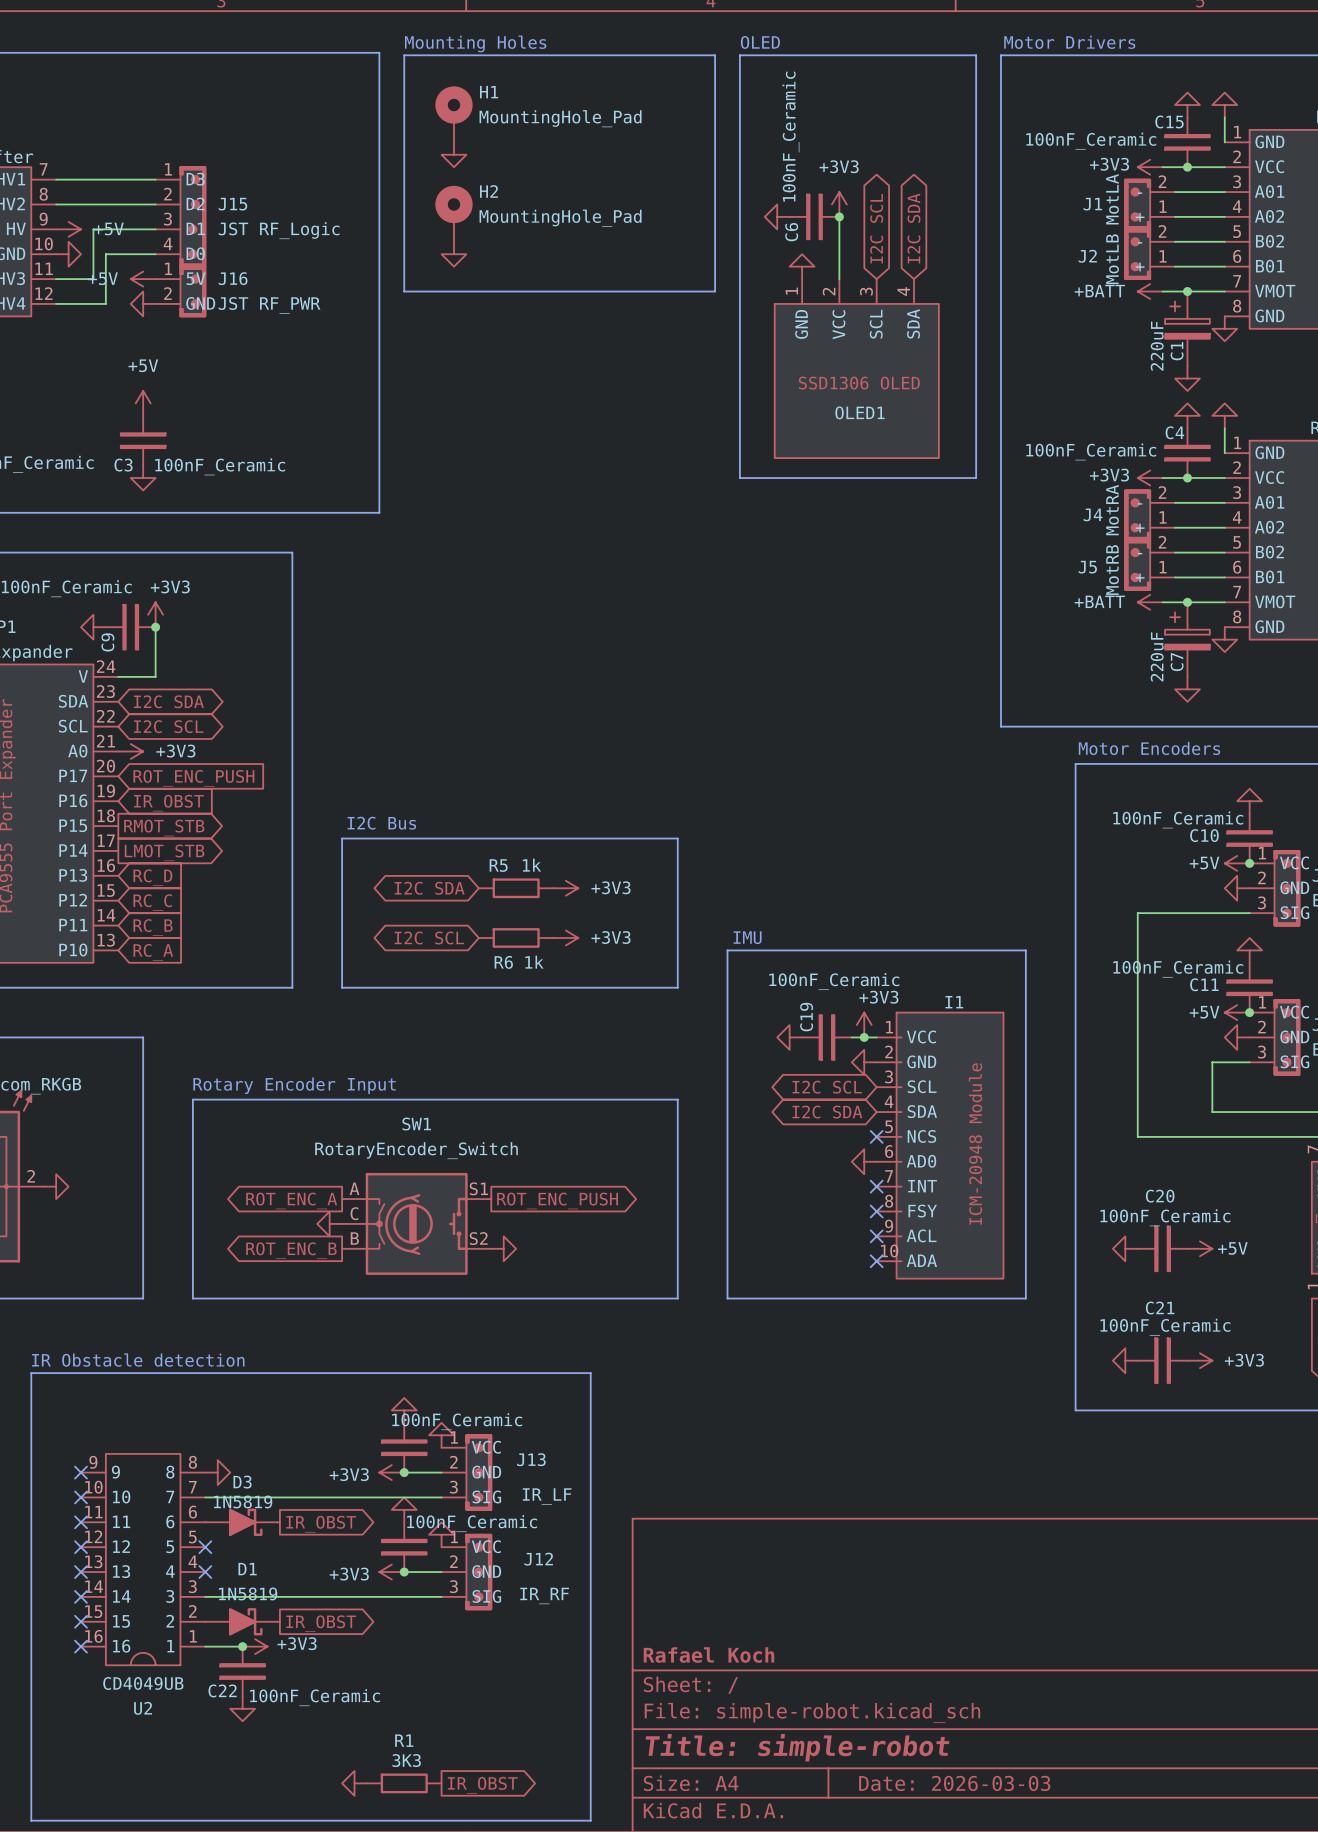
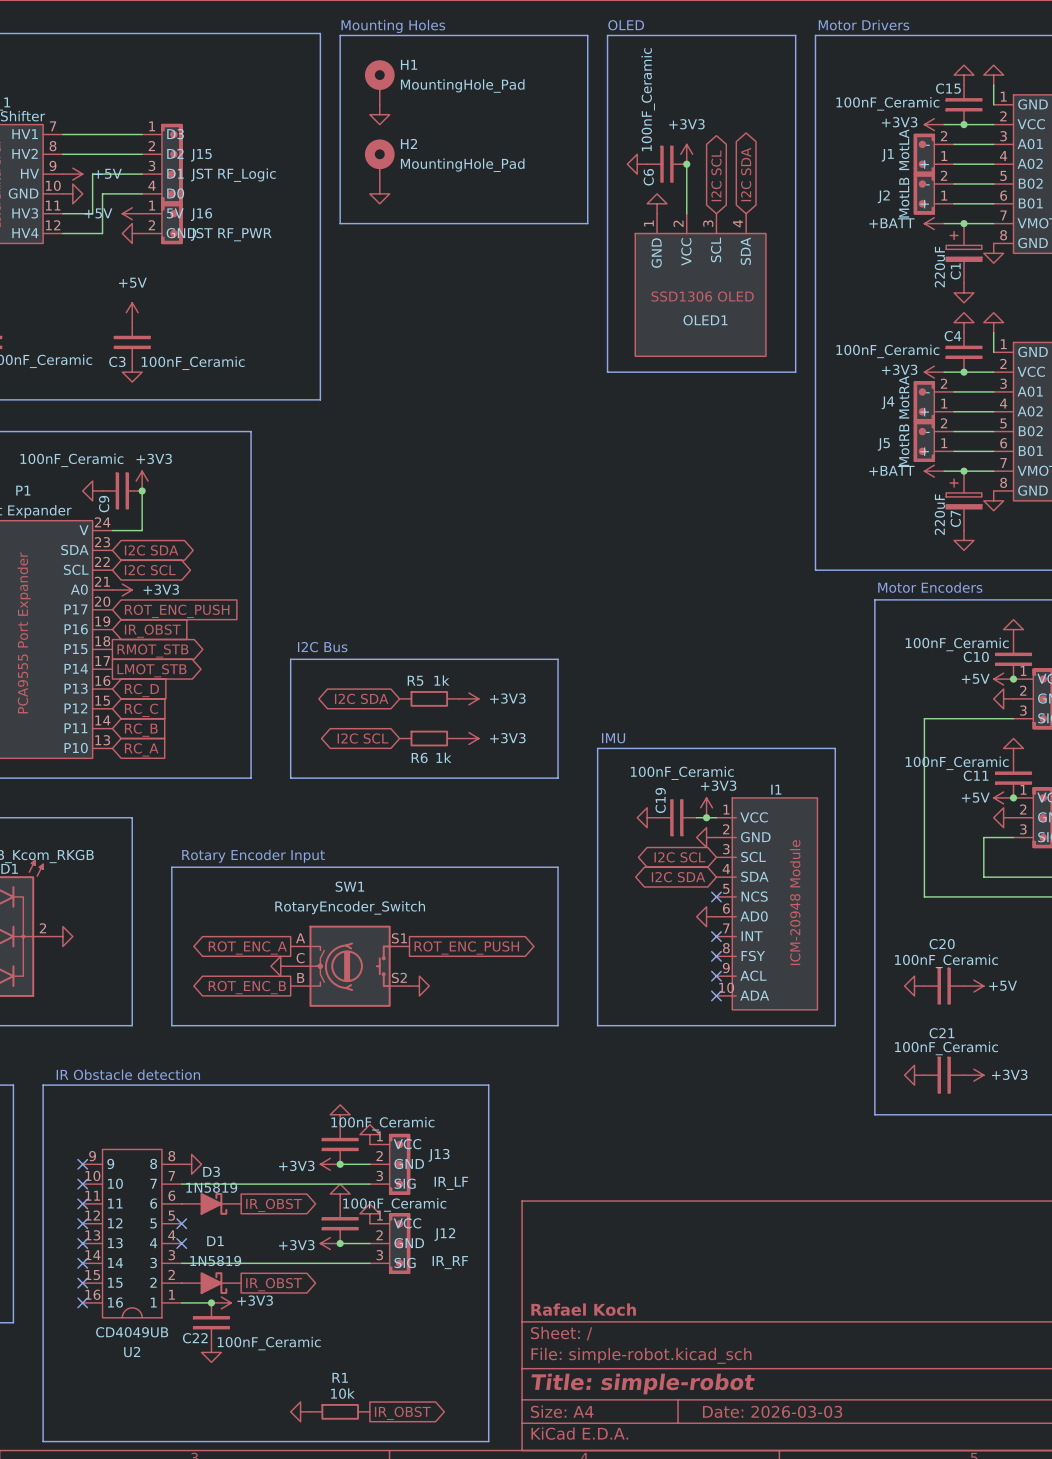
R1 value: 3K3 (406, 1760) -> 10k (342, 1393)

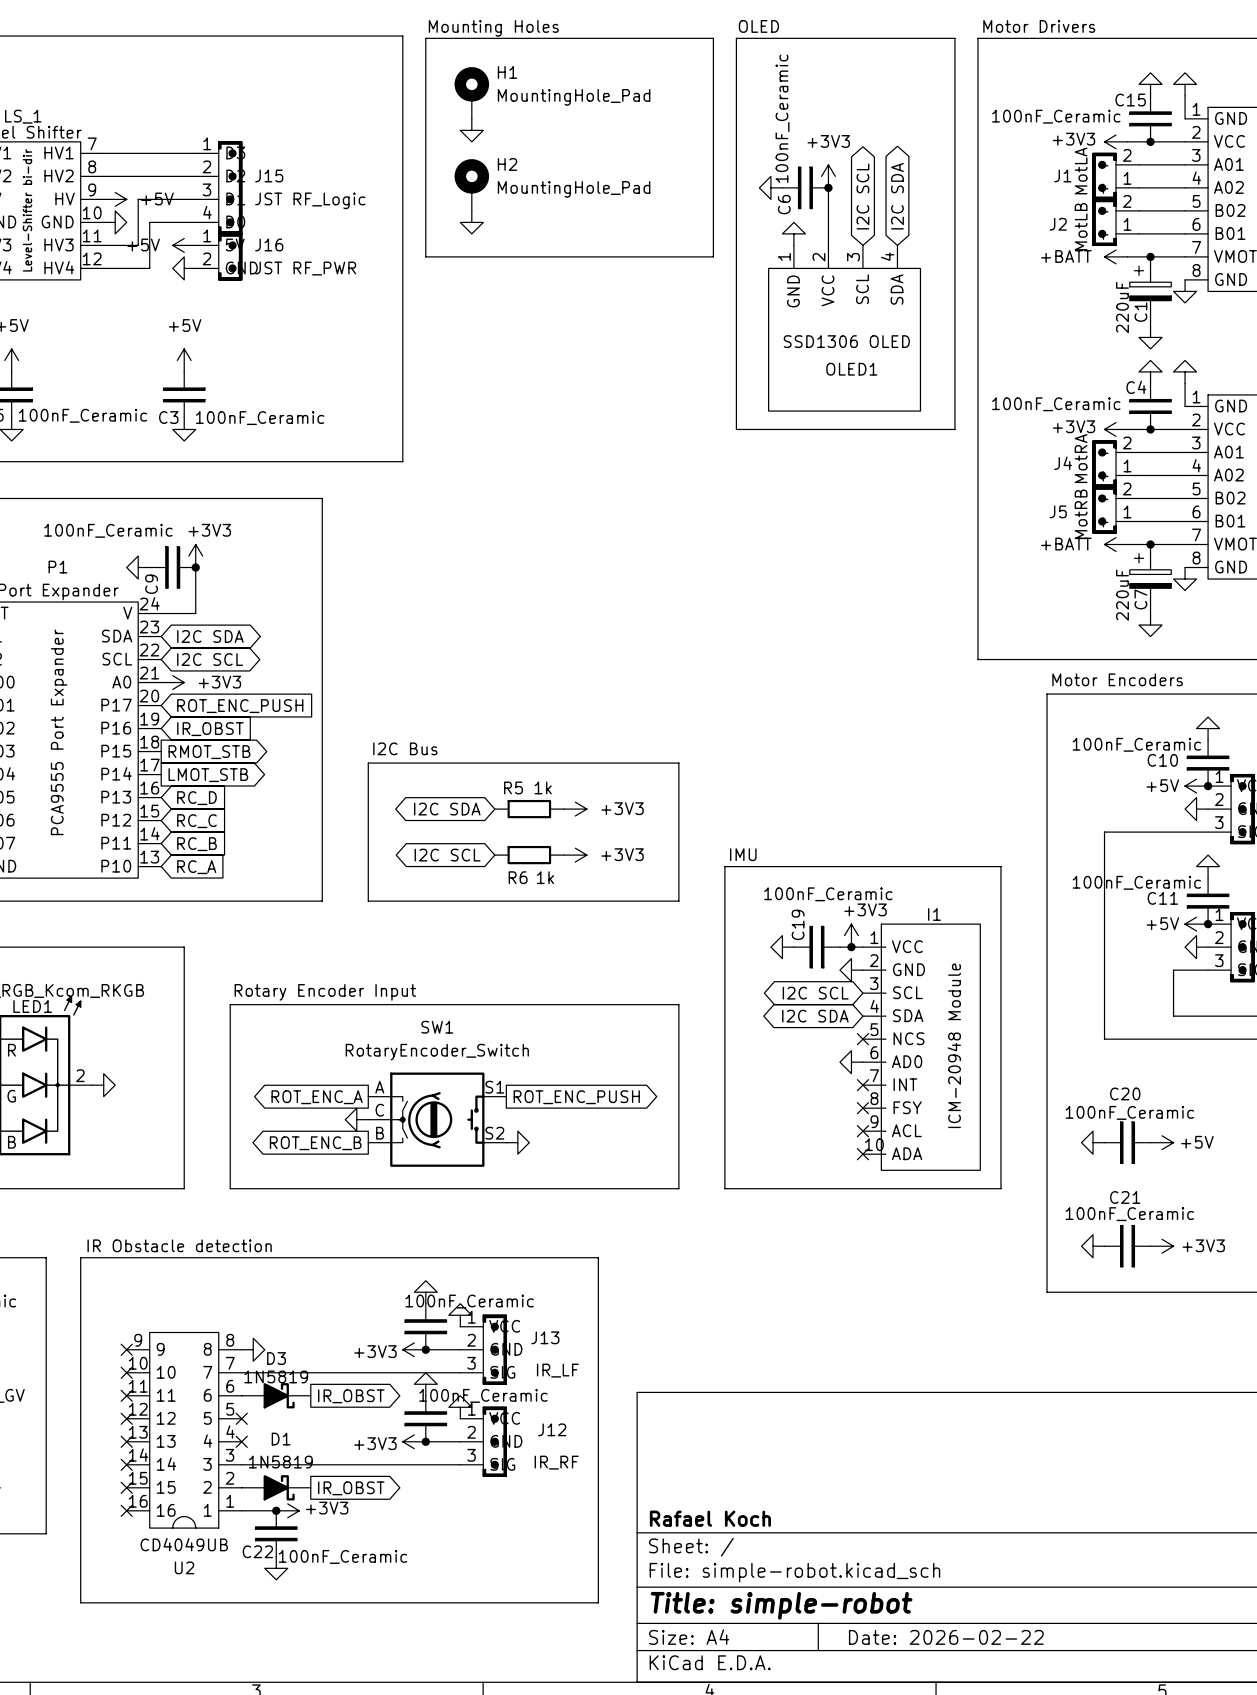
line: (43, 1382) (43, 1441) (488, 1441) (488, 1382) -> (80, 1602) (598, 1602)
power symbol: (300, 1411) -> none
R1: 10k (340, 1411) -> none
title block: Date: 2026-03-03 (772, 1411) -> Date: 2026-02-22 (946, 1637)
global label: IR_OBST (402, 1413) -> none

